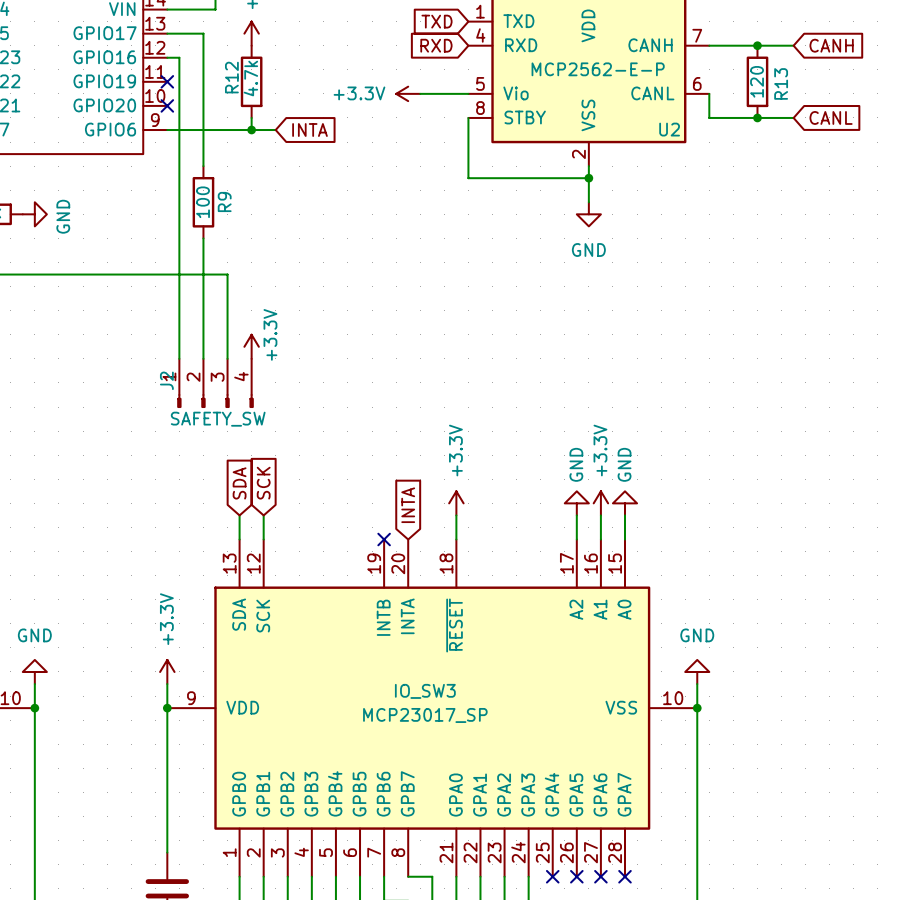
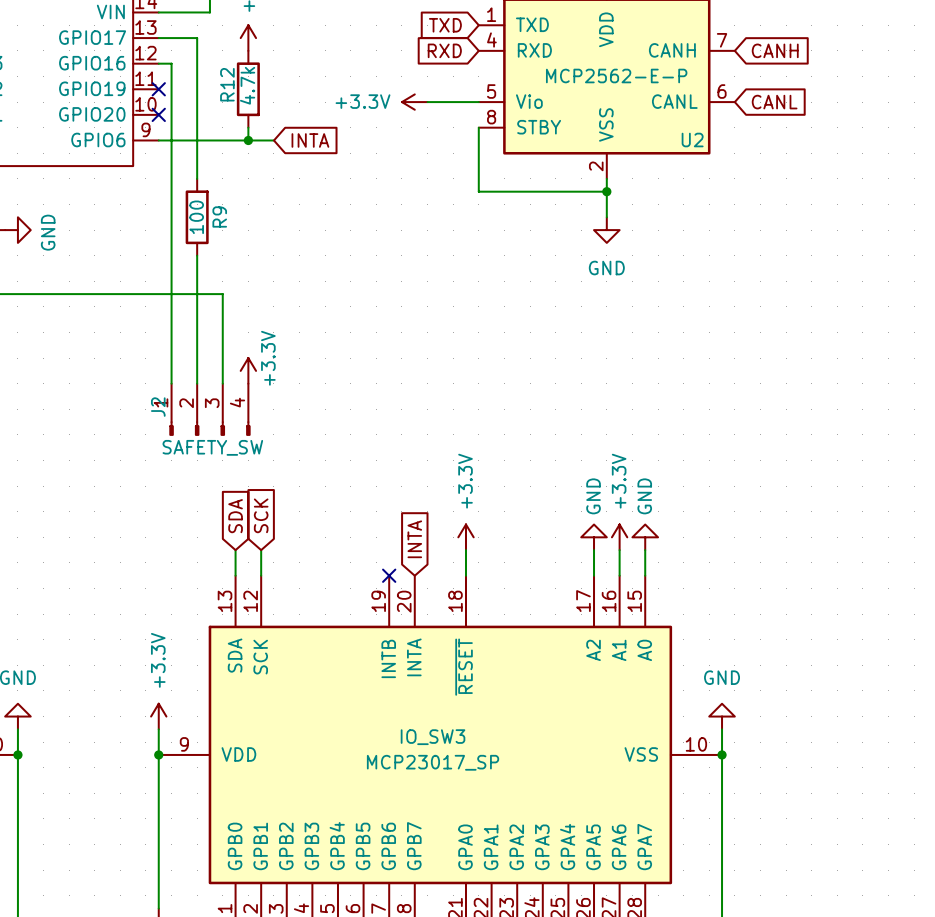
wire: (709, 45) (793, 45) -> none
junction: (757, 45) -> none
global label position: CANH (831, 45) -> CANH (775, 50)
R13: 120 (757, 81) -> none
wire: (709, 93) (709, 117) (793, 117) -> none
junction: (757, 117) -> none
global label position: CANL (831, 117) -> CANL (774, 102)

